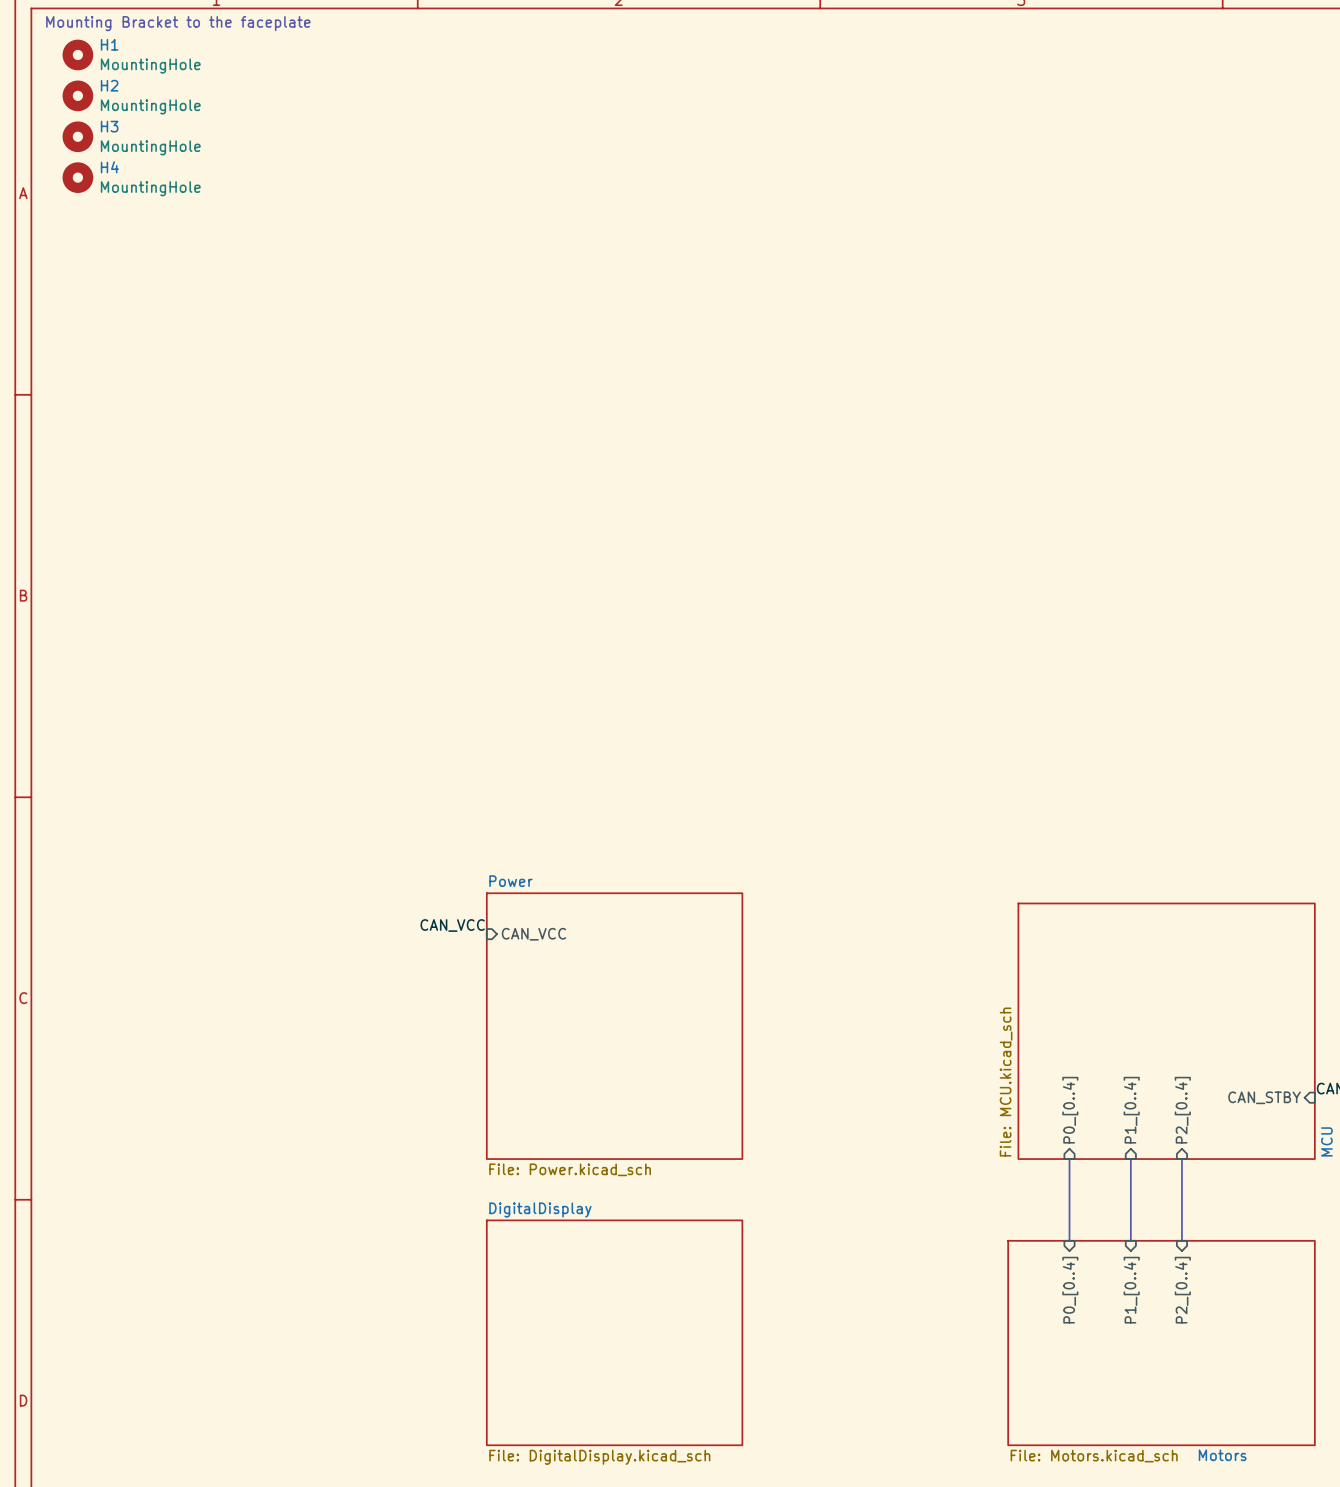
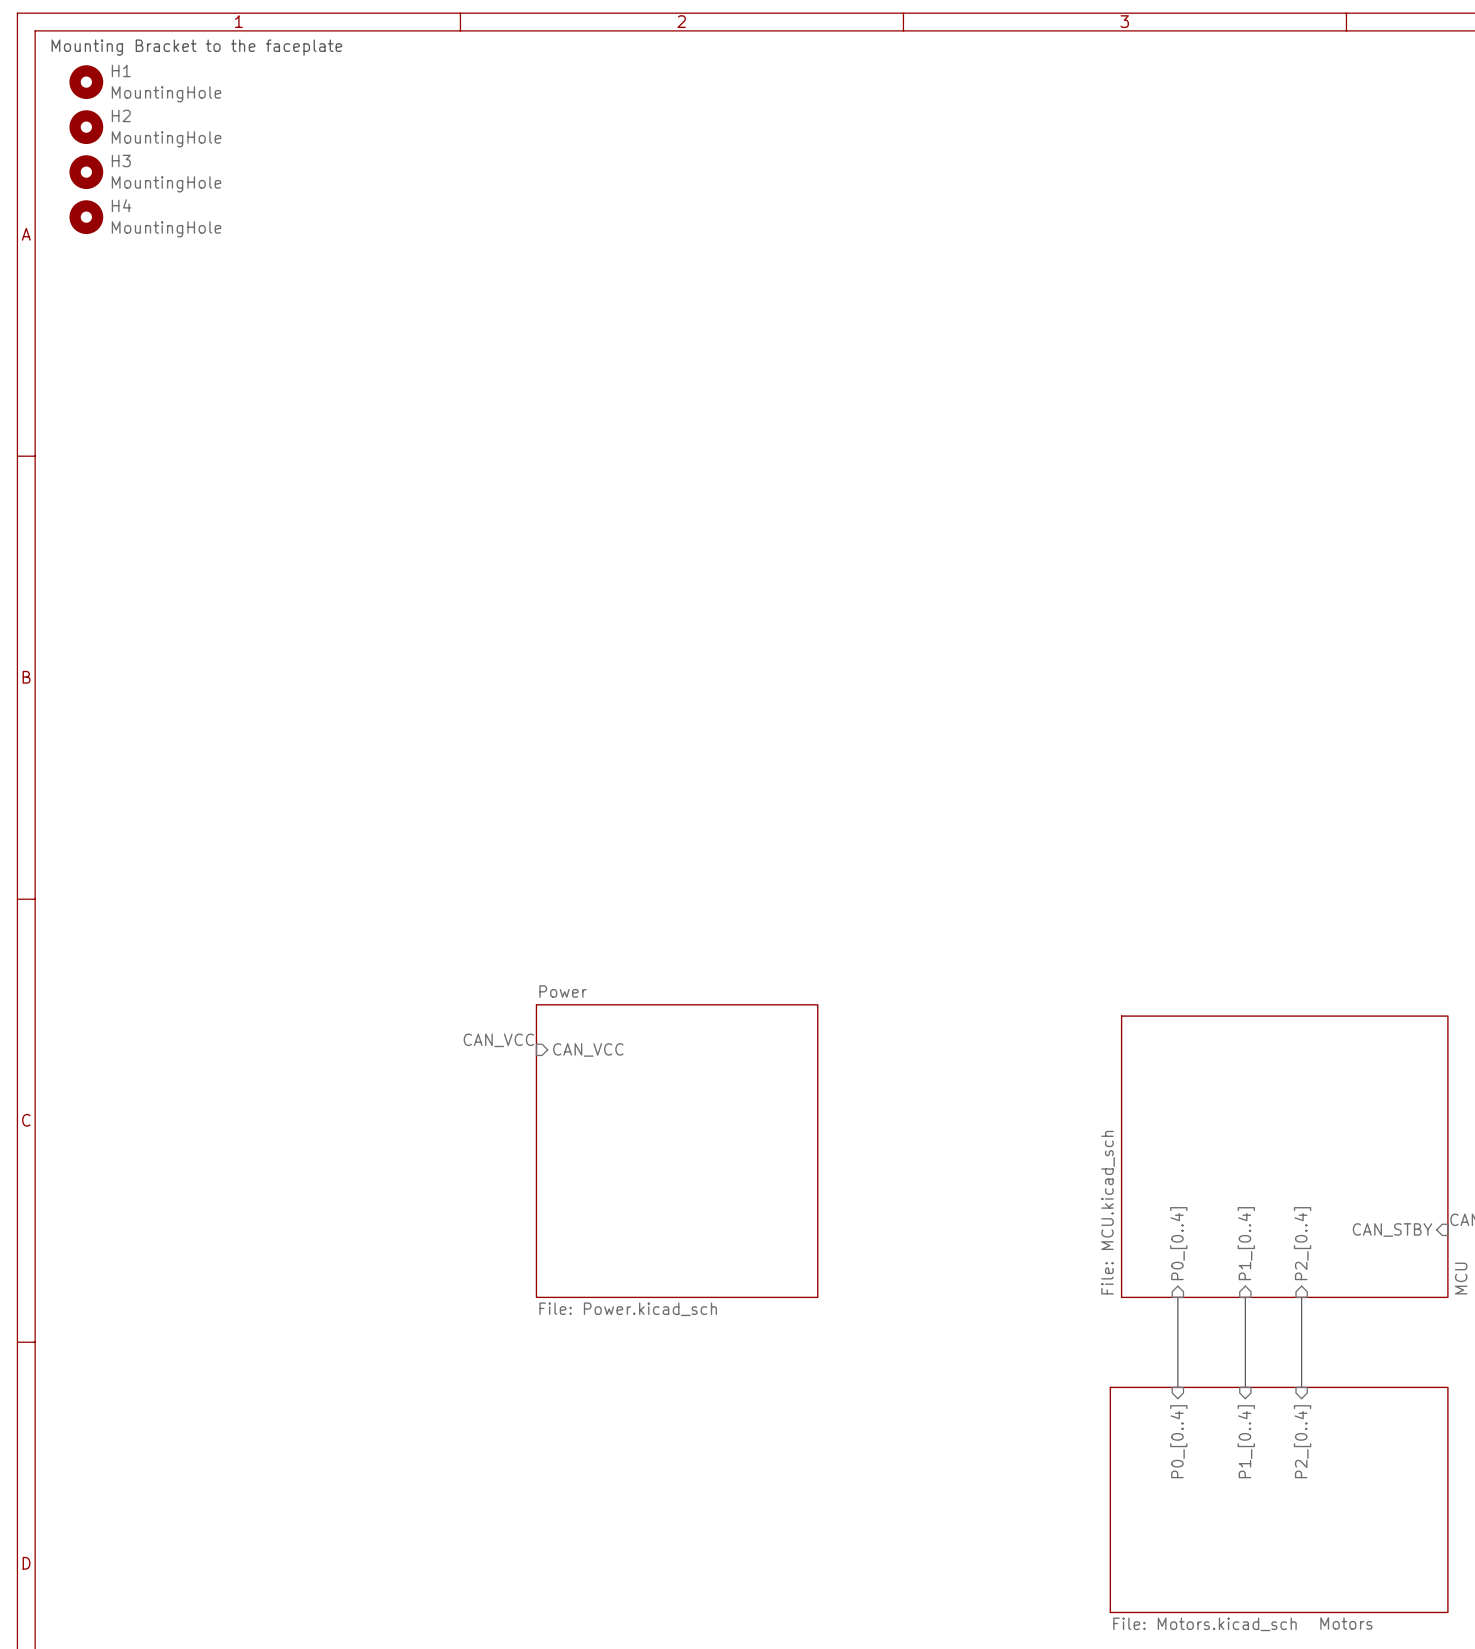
sheet DigitalDisplay: File: DigitalDisplay.kicad_sch (614, 1332) -> none

